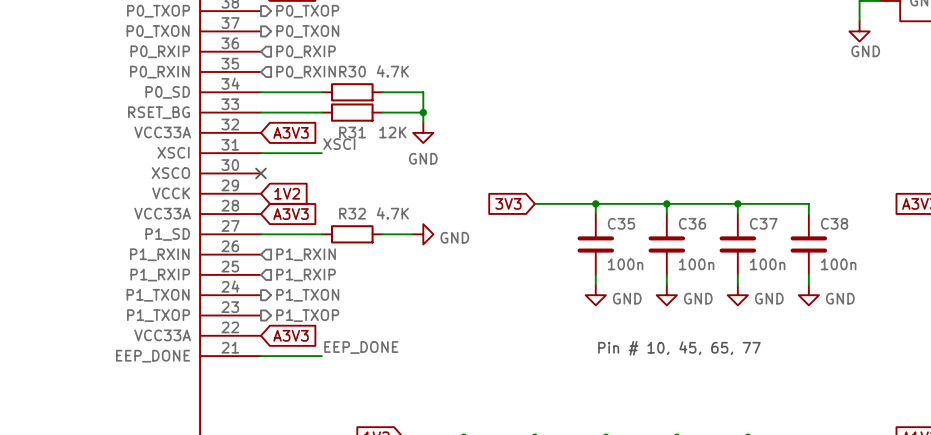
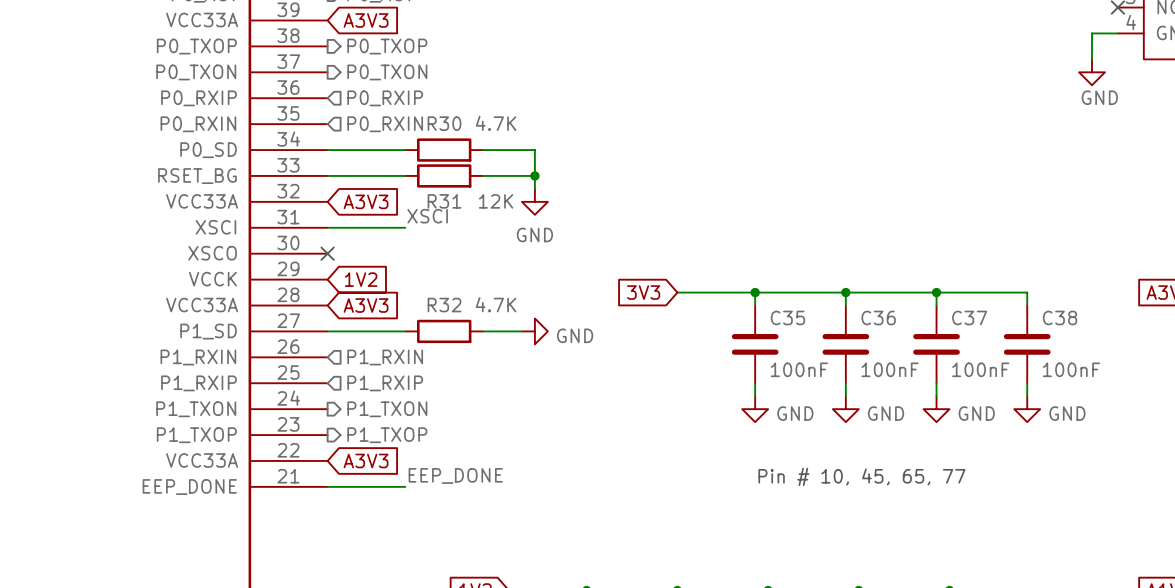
C35 value: 100n (625, 264) -> 100nF (799, 369)
C36 value: 100n (696, 264) -> 100nF (890, 369)
C37 value: 100n (767, 264) -> 100nF (980, 369)
C38 value: 100n (838, 264) -> 100nF (1071, 369)

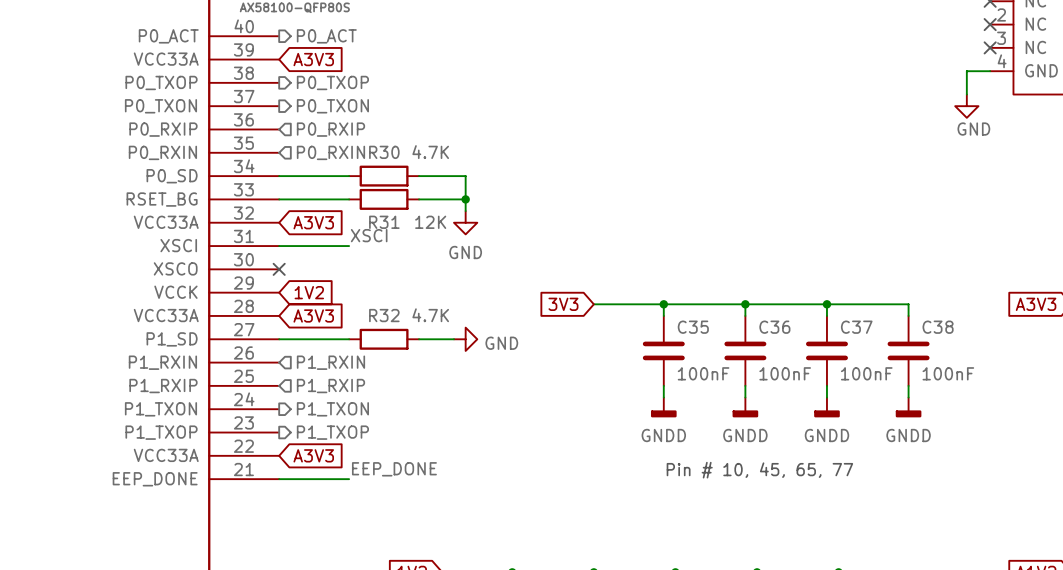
power symbol: GND (755, 409) -> GNDD (663, 407)
power symbol: GND (845, 409) -> GNDD (745, 407)
power symbol: GND (936, 409) -> GNDD (826, 407)
power symbol: GND (1027, 409) -> GNDD (908, 407)

